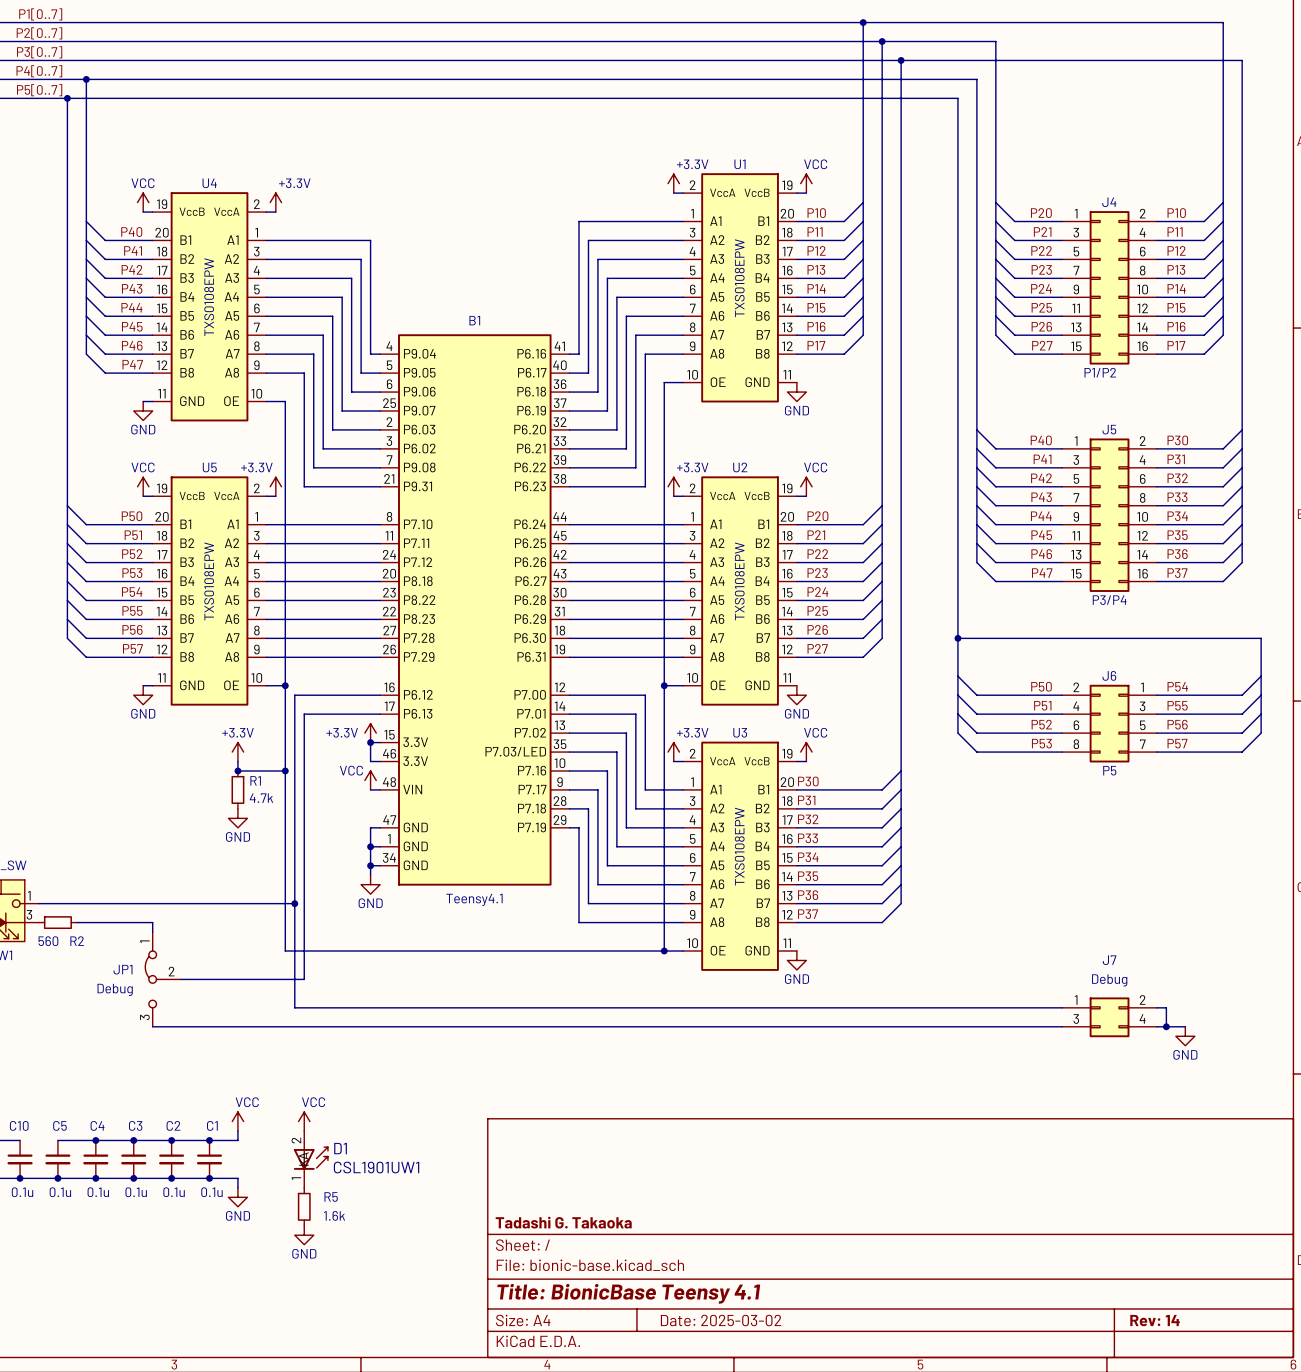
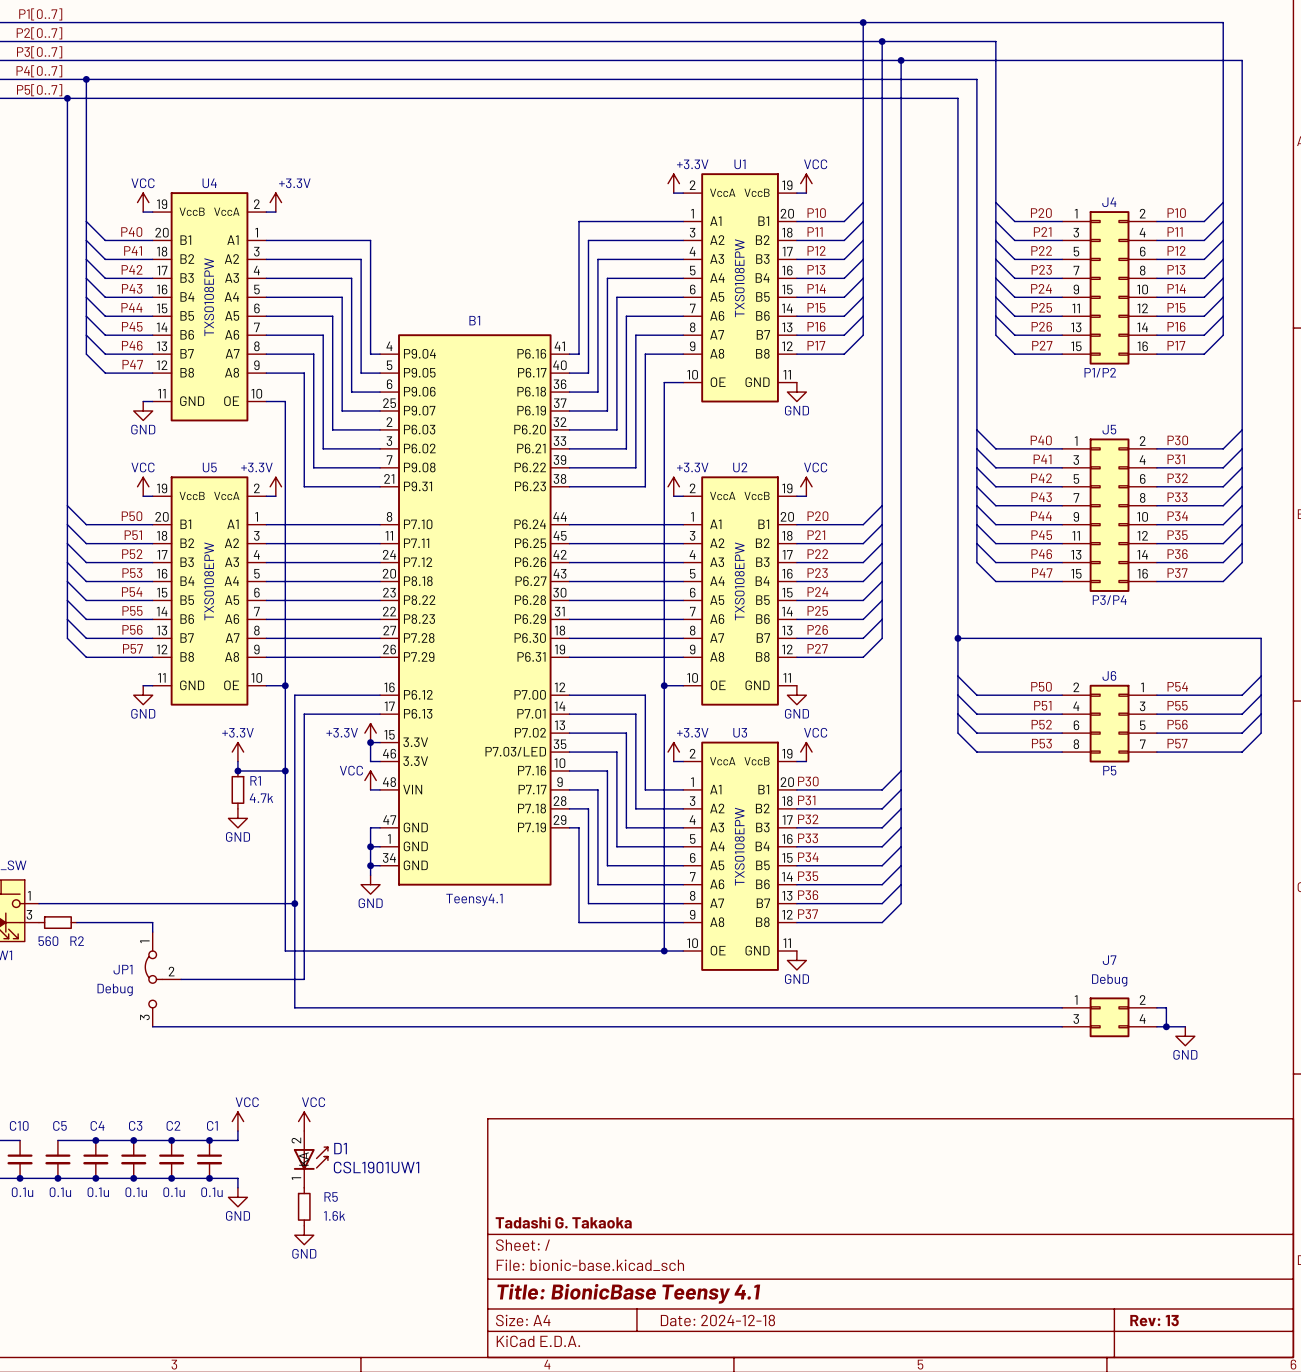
title block: Date: 2025-03-02 (721, 1320) -> Date: 2024-12-18 (717, 1320)
title block: Rev: 14 (1155, 1320) -> Rev: 13 (1154, 1320)

